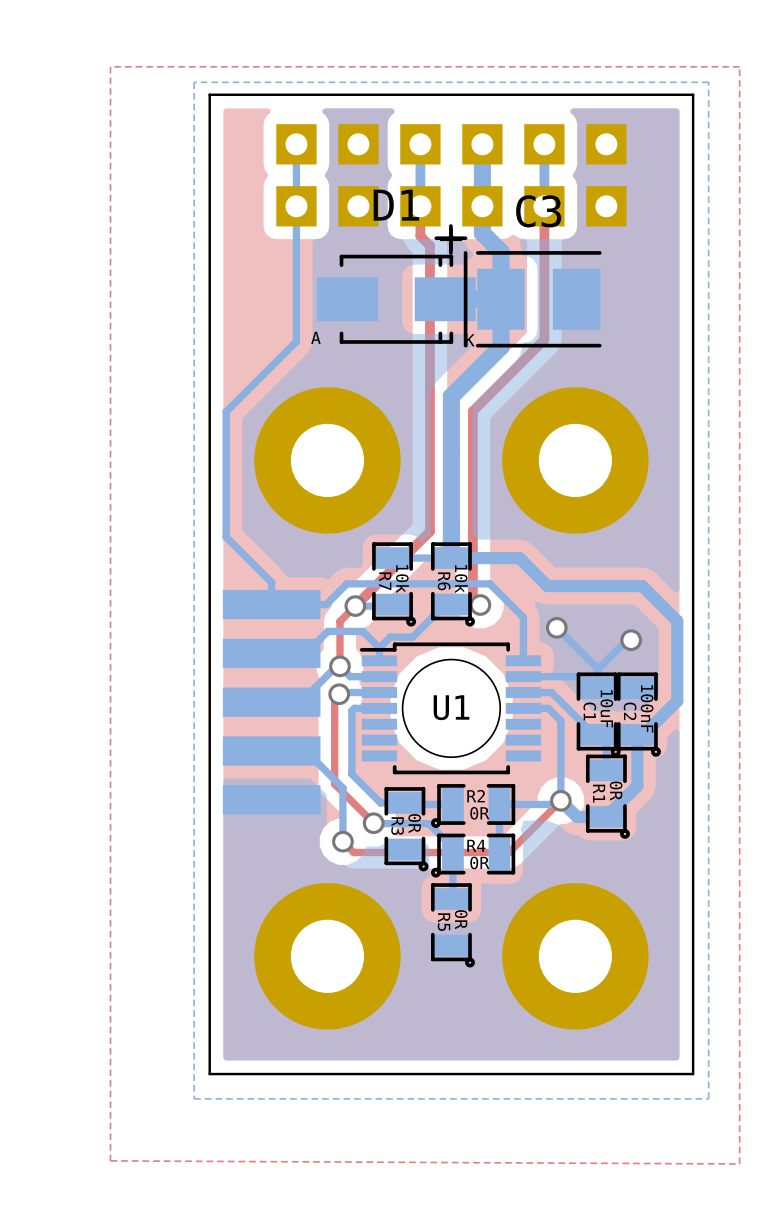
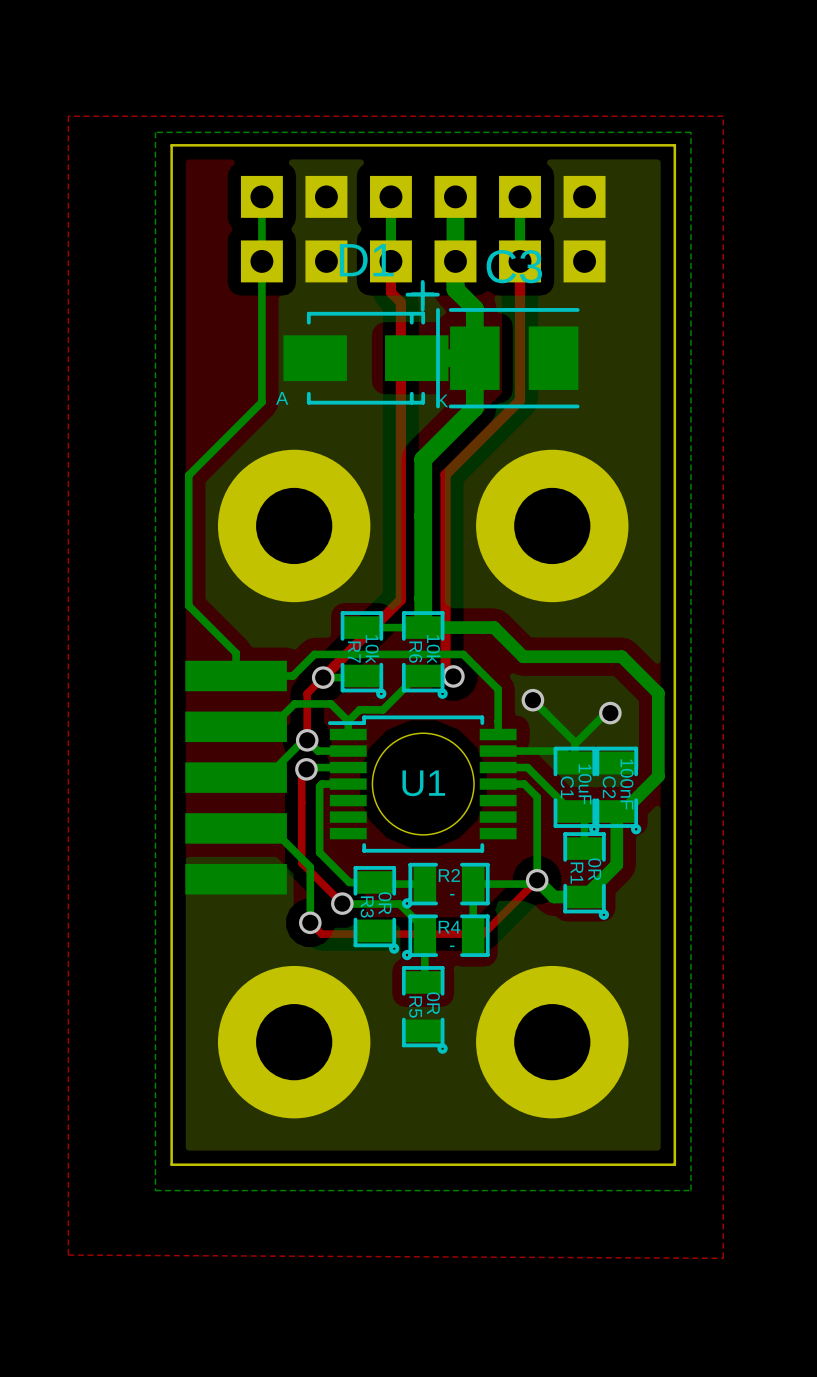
R2 value: 0R (479, 813) -> - (452, 894)
R4 value: 0R (479, 862) -> - (452, 946)

